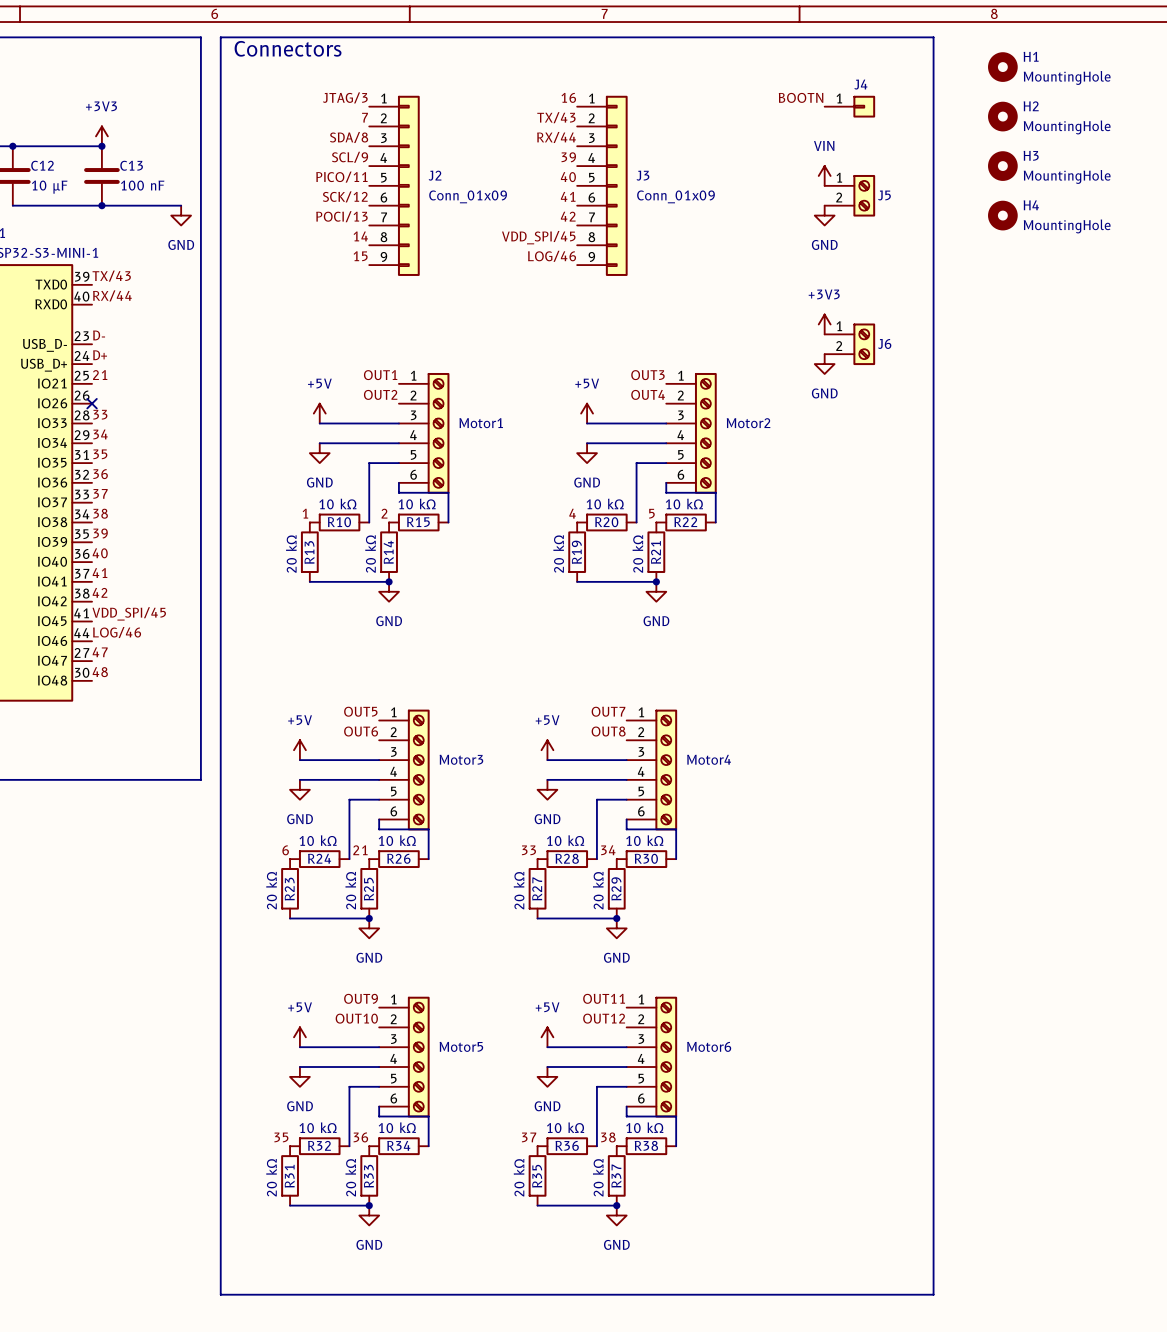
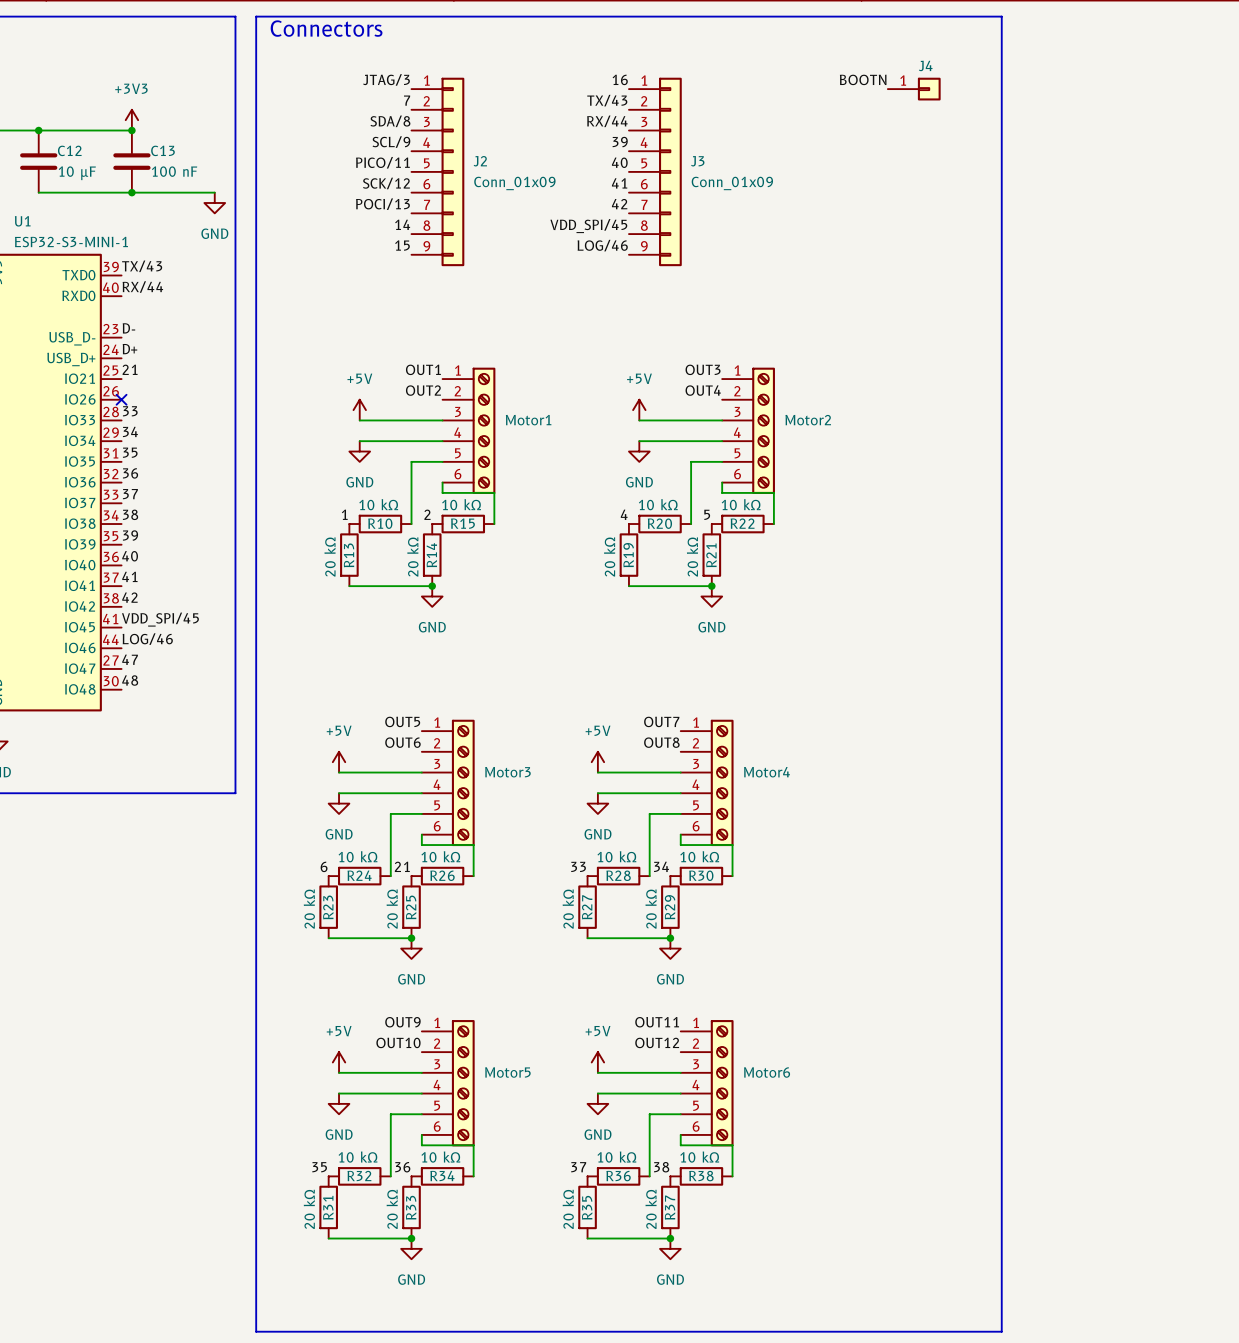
H1: MountingHole (1002, 67) -> none
H2: MountingHole (1002, 116) -> none
H3: MountingHole (1002, 166) -> none
power symbol: VIN (824, 175) -> none
J5: (849, 195) -> none
power symbol: GND (824, 215) -> none
H4: MountingHole (1002, 215) -> none
power symbol: +3V3 (824, 324) -> none
J6: (849, 344) -> none
power symbol: GND (824, 364) -> none

